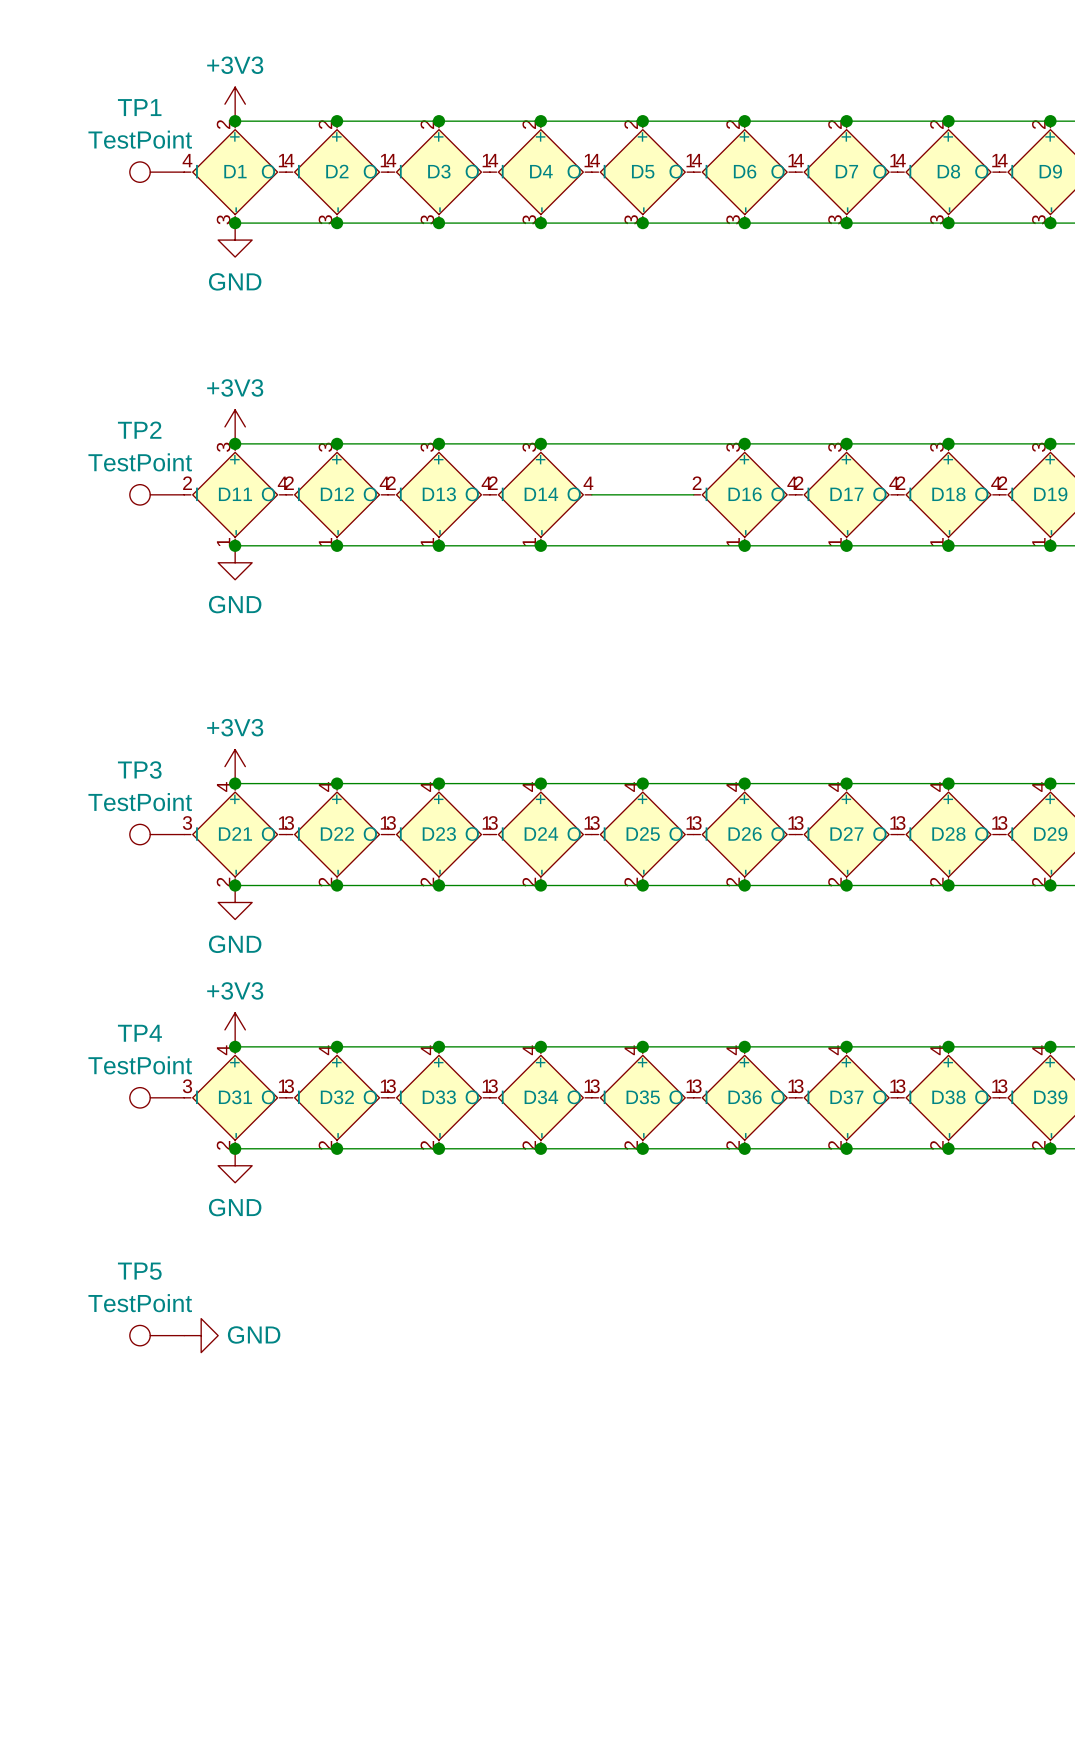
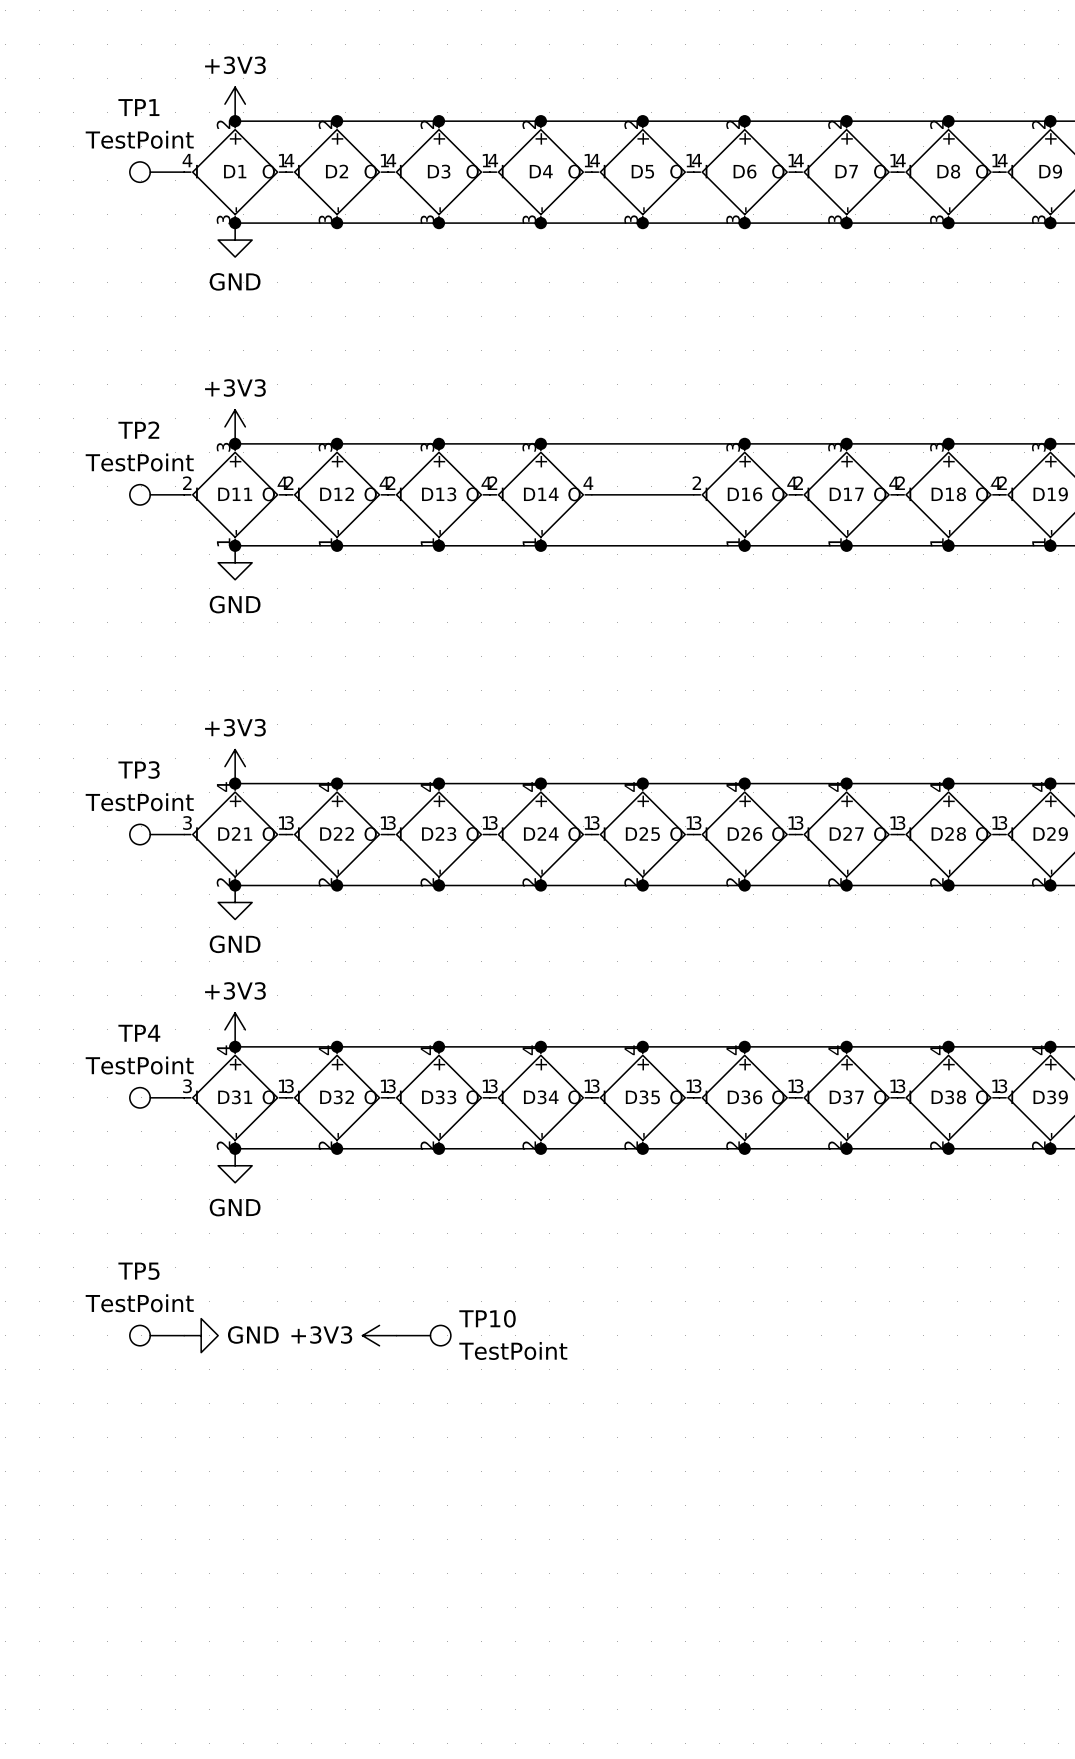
power symbol: none -> +3V3 (379, 1335)
TP10: none -> TestPoint (423, 1335)

